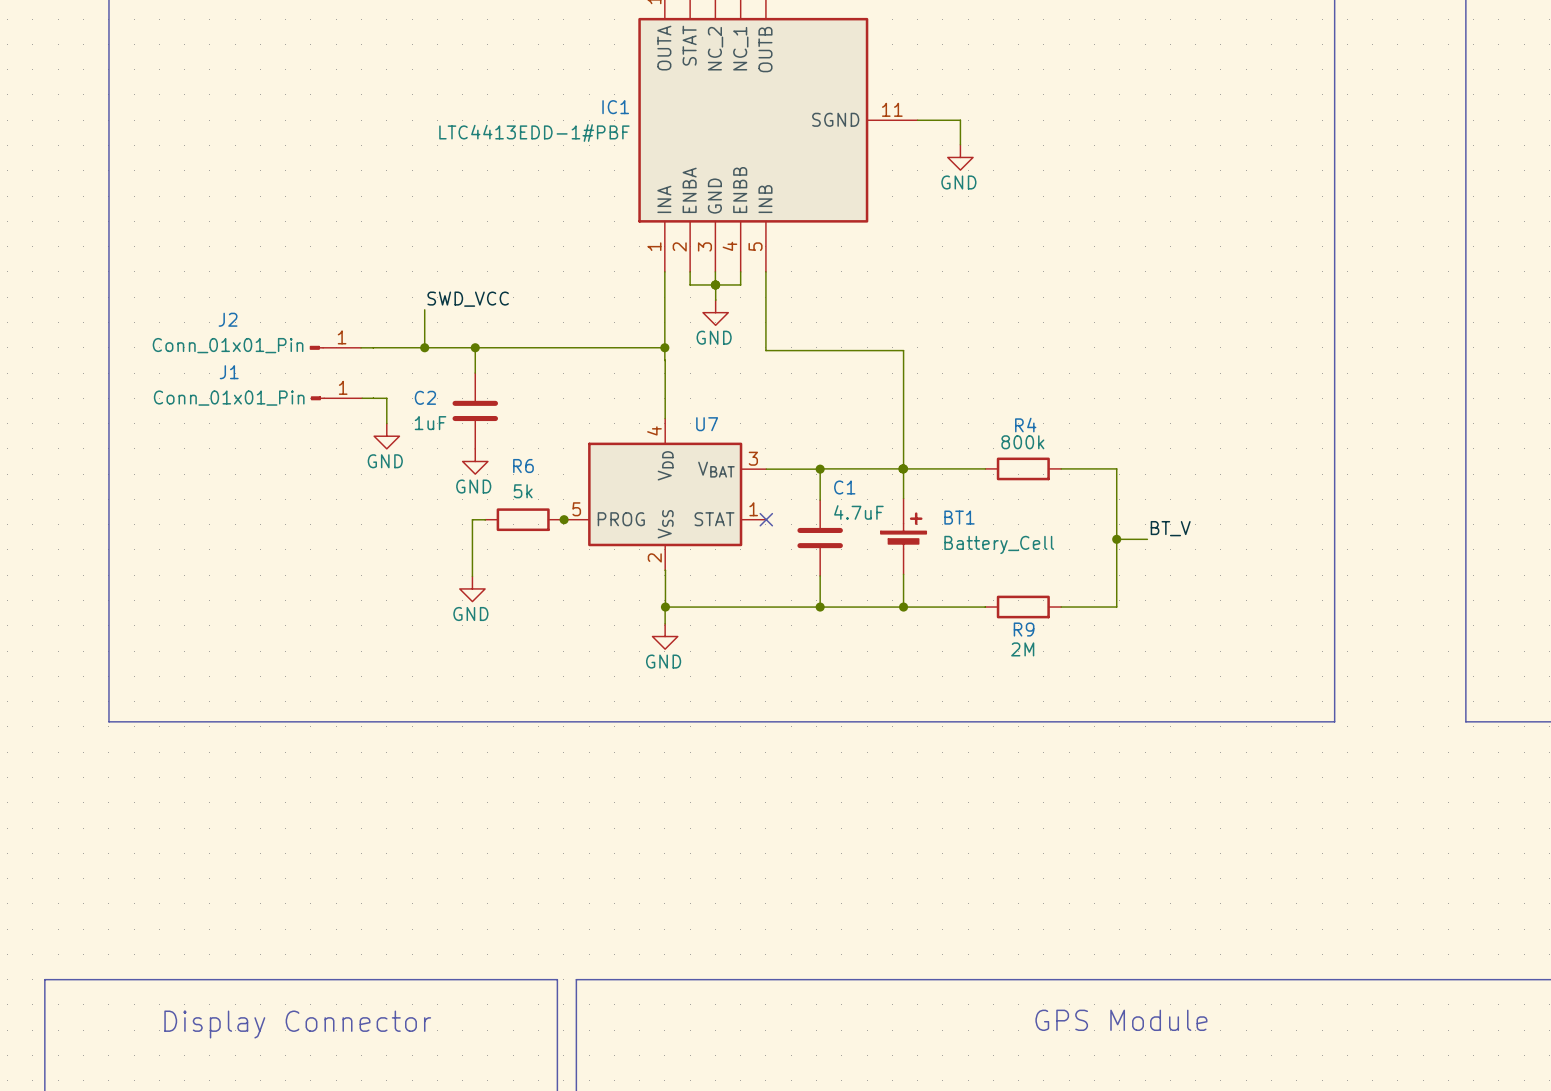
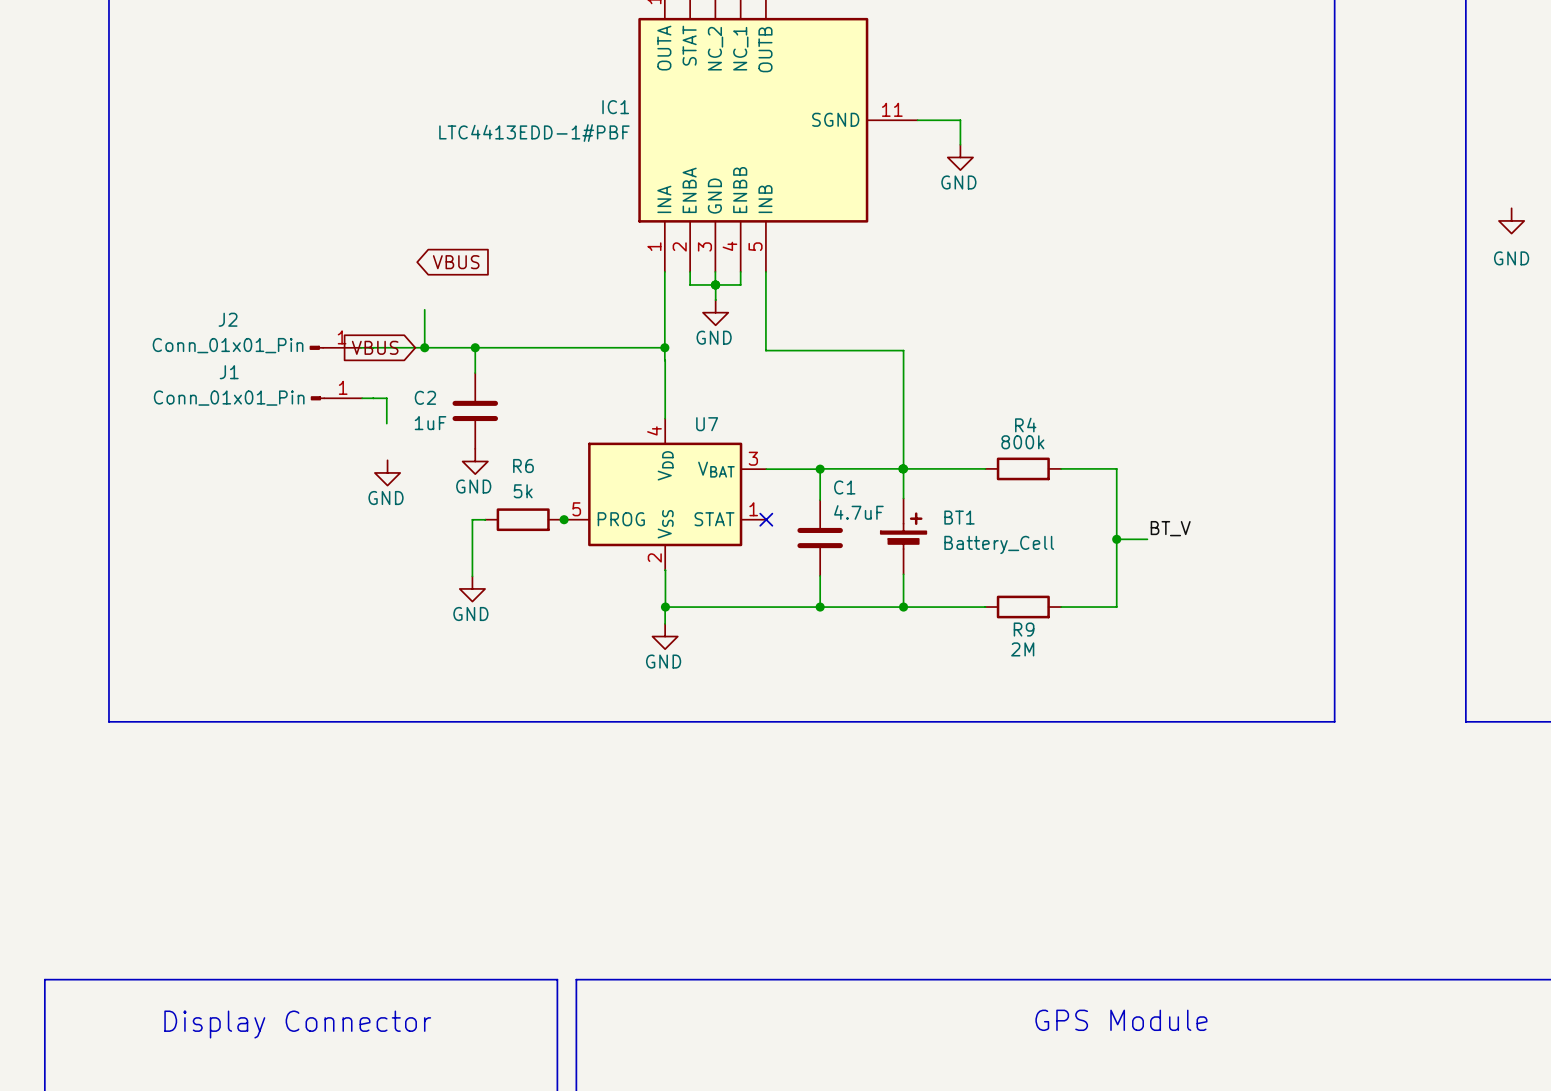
power symbol: none -> GND (1511, 220)
global label: none -> VBUS (456, 262)
label: SWD_VCC (468, 299) -> none
global label: none -> VBUS (375, 347)
power symbol position: GND (386, 436) -> GND (387, 472)

